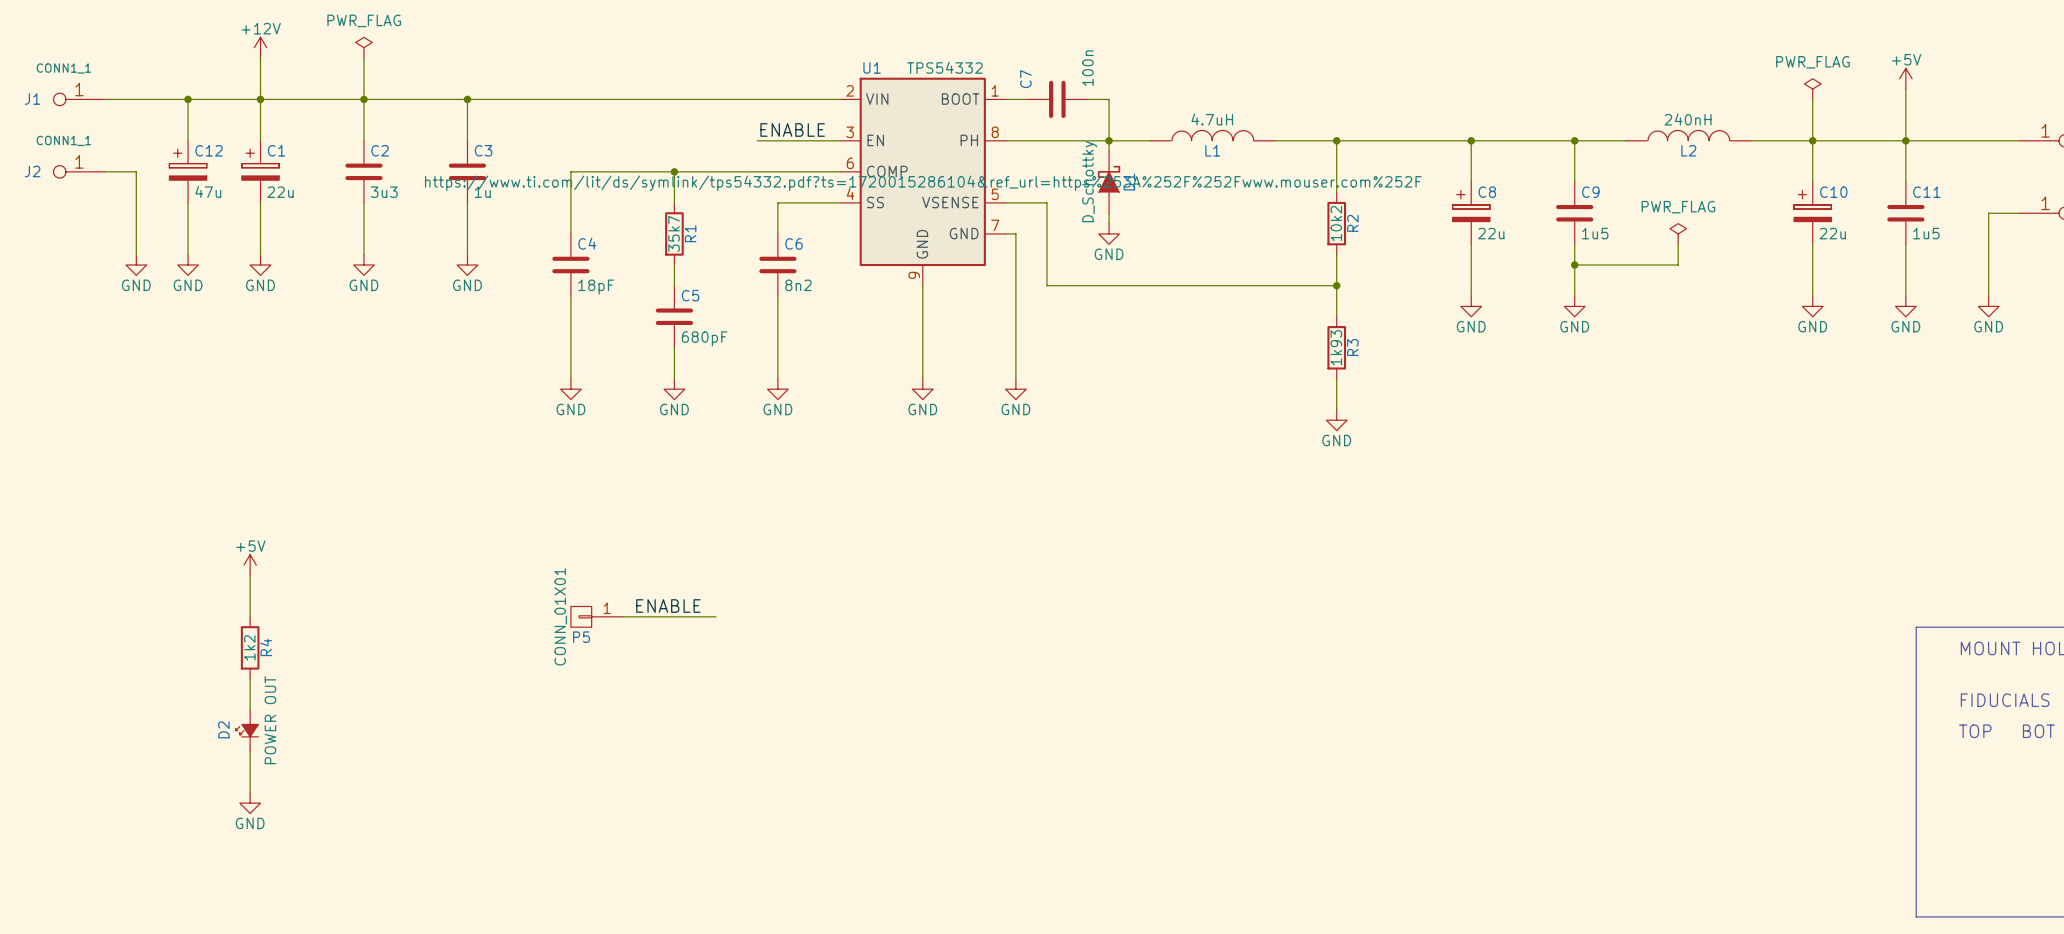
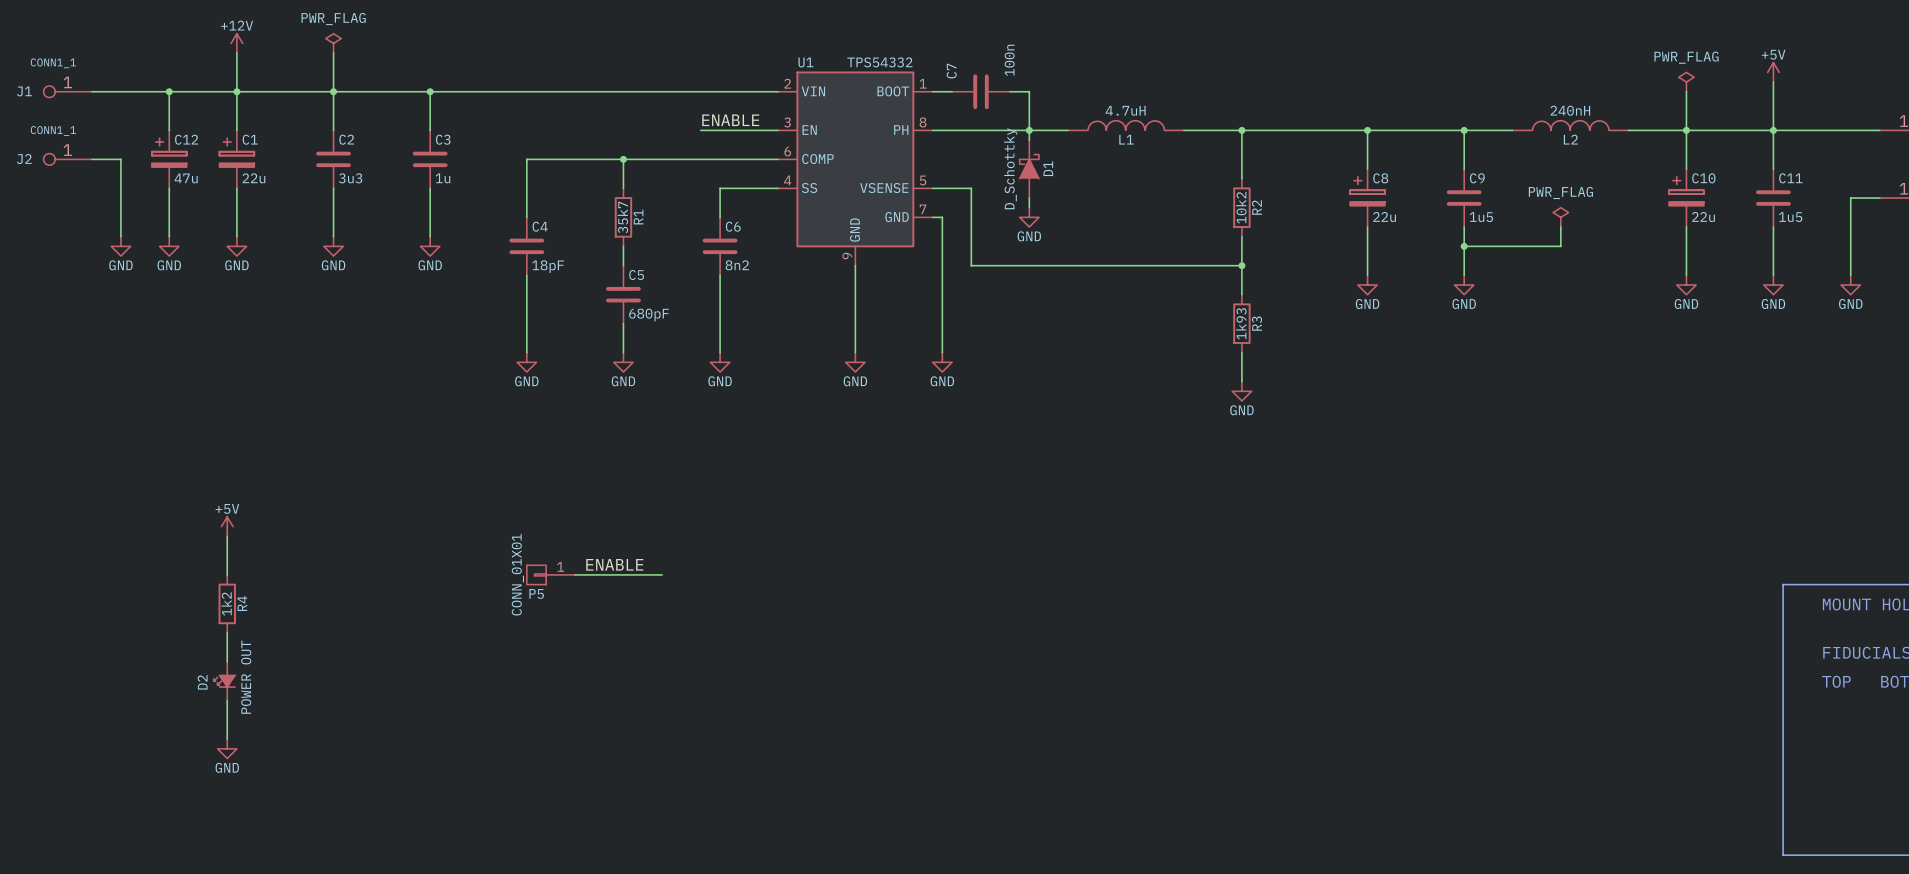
U1 text: https://www.ti.com/lit/ds/symlink/tps54332.pdf?ts=1720015286104&ref_url=https%253A%252F%252Fwww.mouser.com%252F (923, 183) -> none

